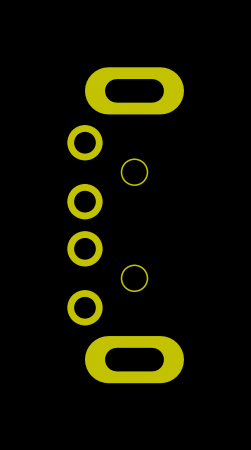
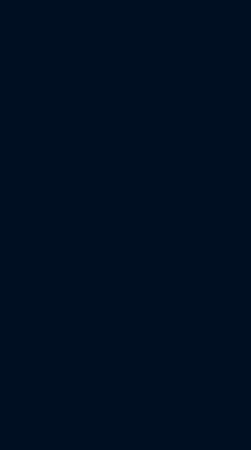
part: (125, 225) -> none

